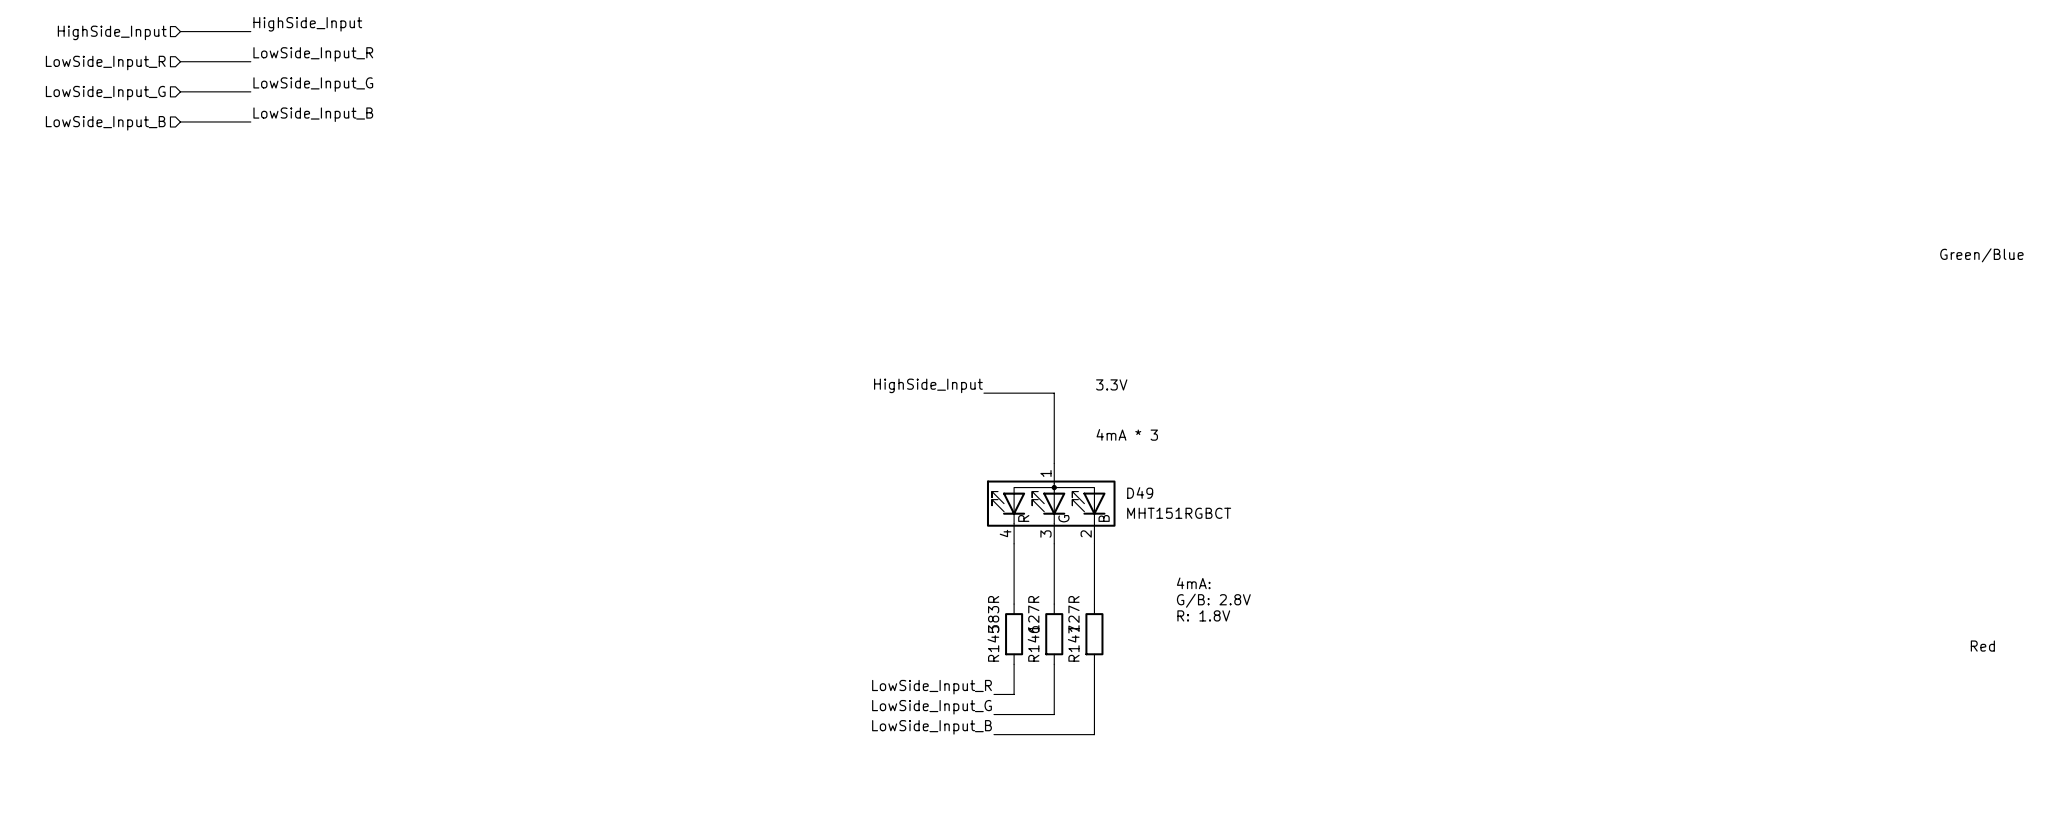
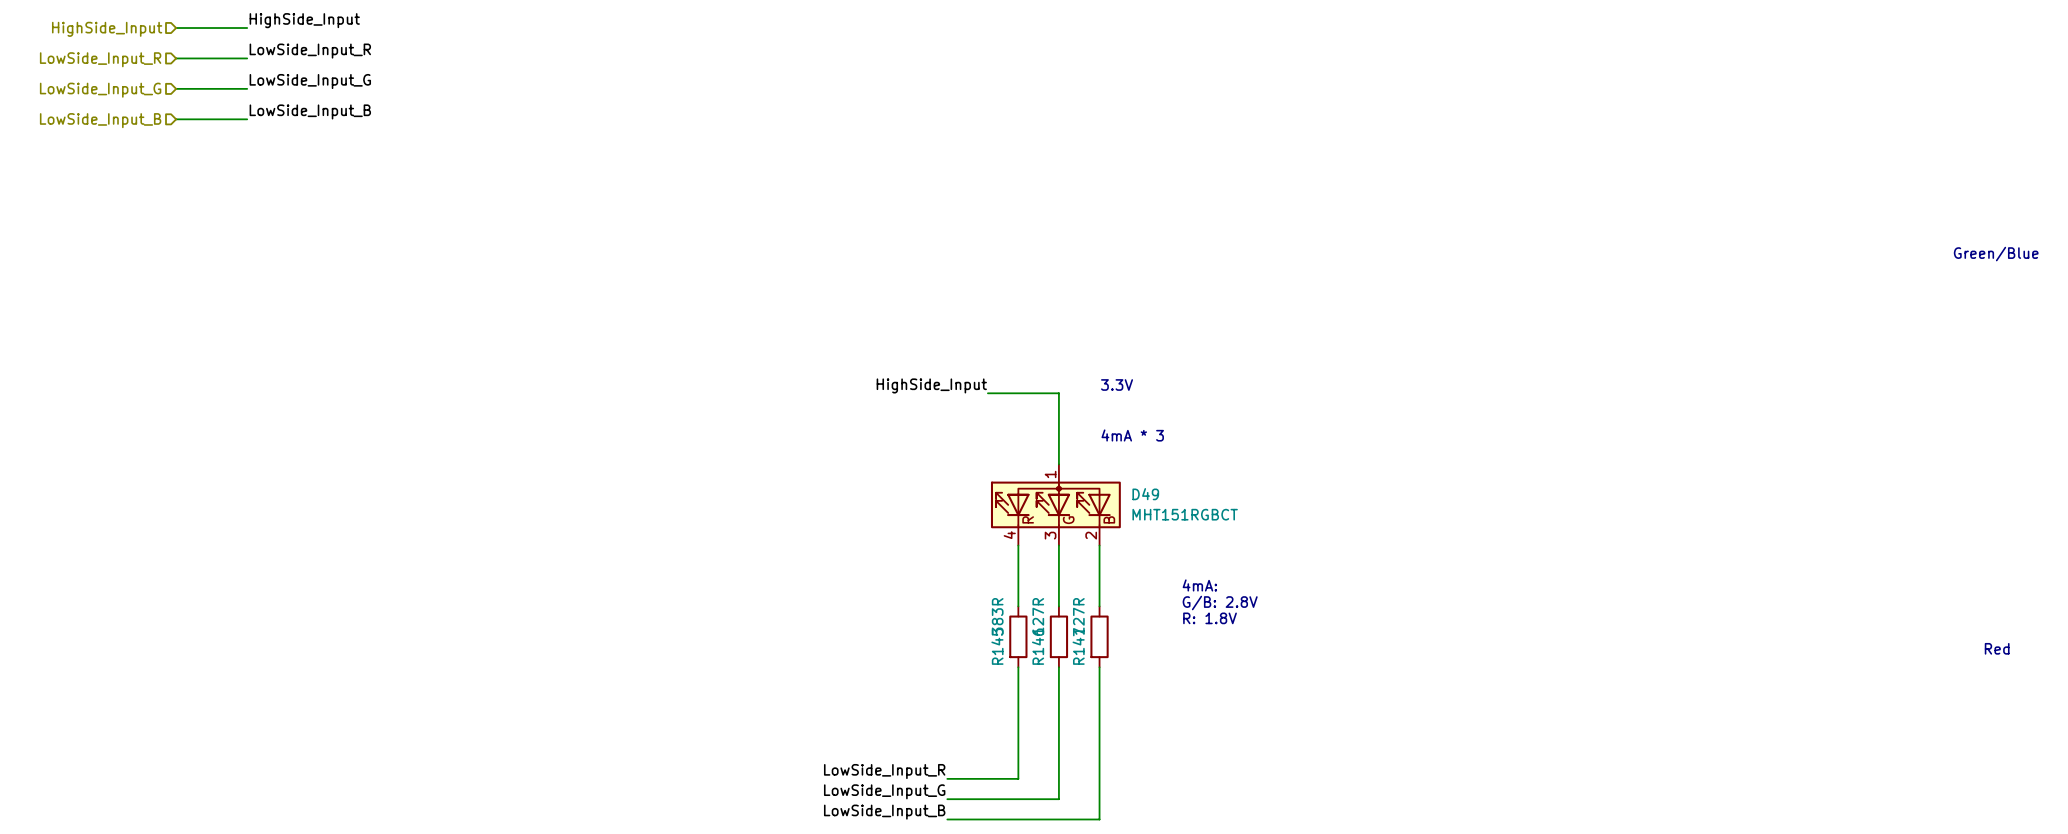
label position: LowSide_Input_R (931, 687) -> LowSide_Input_R (884, 771)
wire: (994, 694) (1014, 694) -> (947, 778) (1018, 778) (1018, 697)
label position: LowSide_Input_G (931, 707) -> LowSide_Input_G (884, 791)
wire: (994, 714) (1054, 714) -> (947, 799) (1058, 799) (1058, 718)
label position: LowSide_Input_B (931, 727) -> LowSide_Input_B (884, 812)
wire: (994, 734) (1094, 734) -> (947, 819) (1099, 819) (1099, 738)

